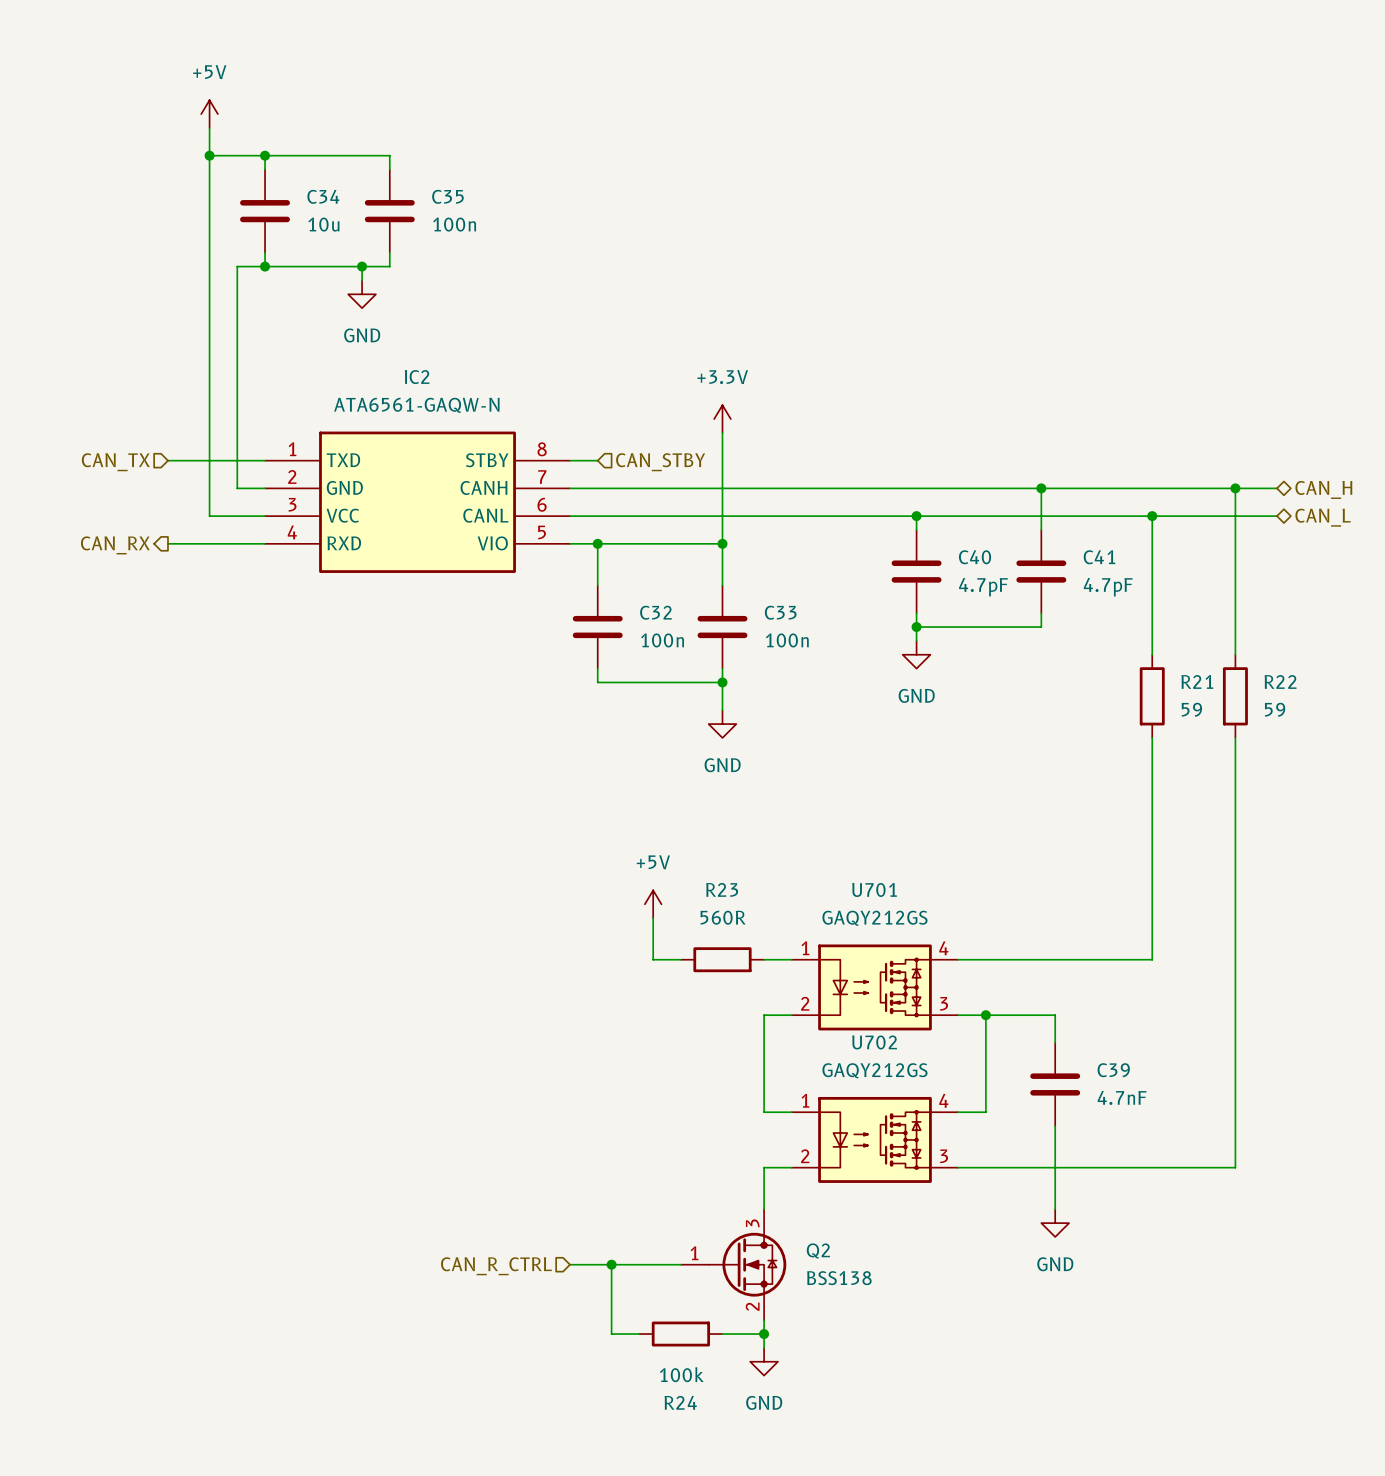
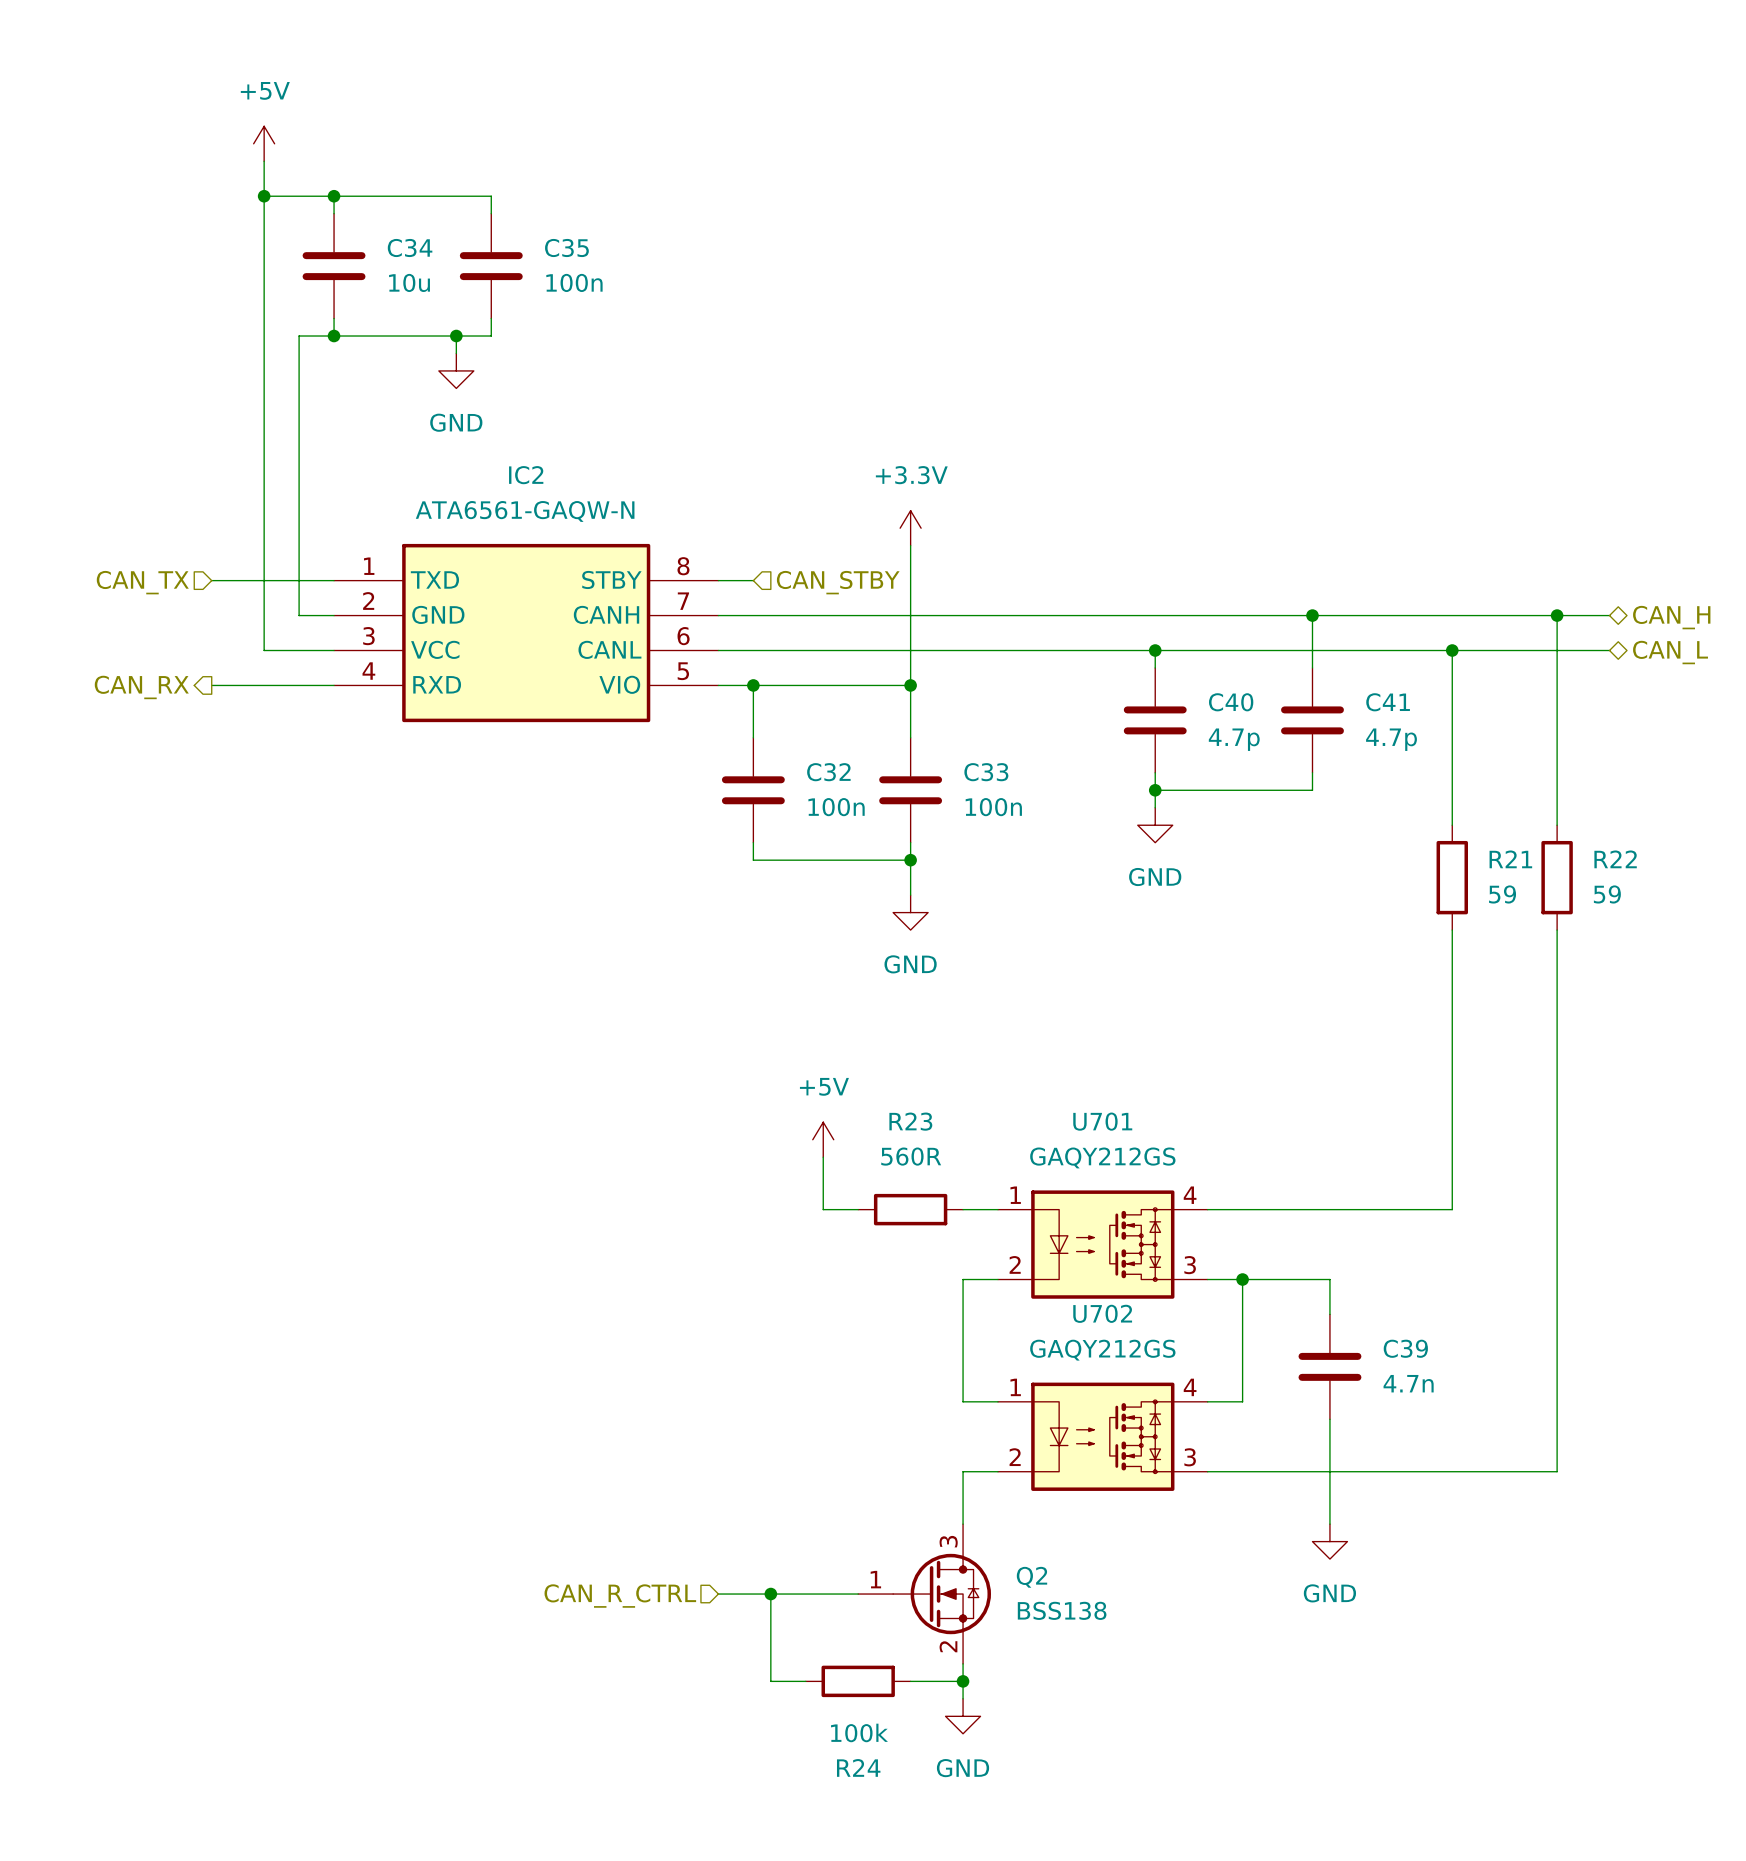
C40 value: 4.7pF (983, 587) -> 4.7p (1234, 739)
C41 value: 4.7pF (1108, 587) -> 4.7p (1391, 739)
C39 value: 4.7nF (1122, 1097) -> 4.7n (1408, 1383)

